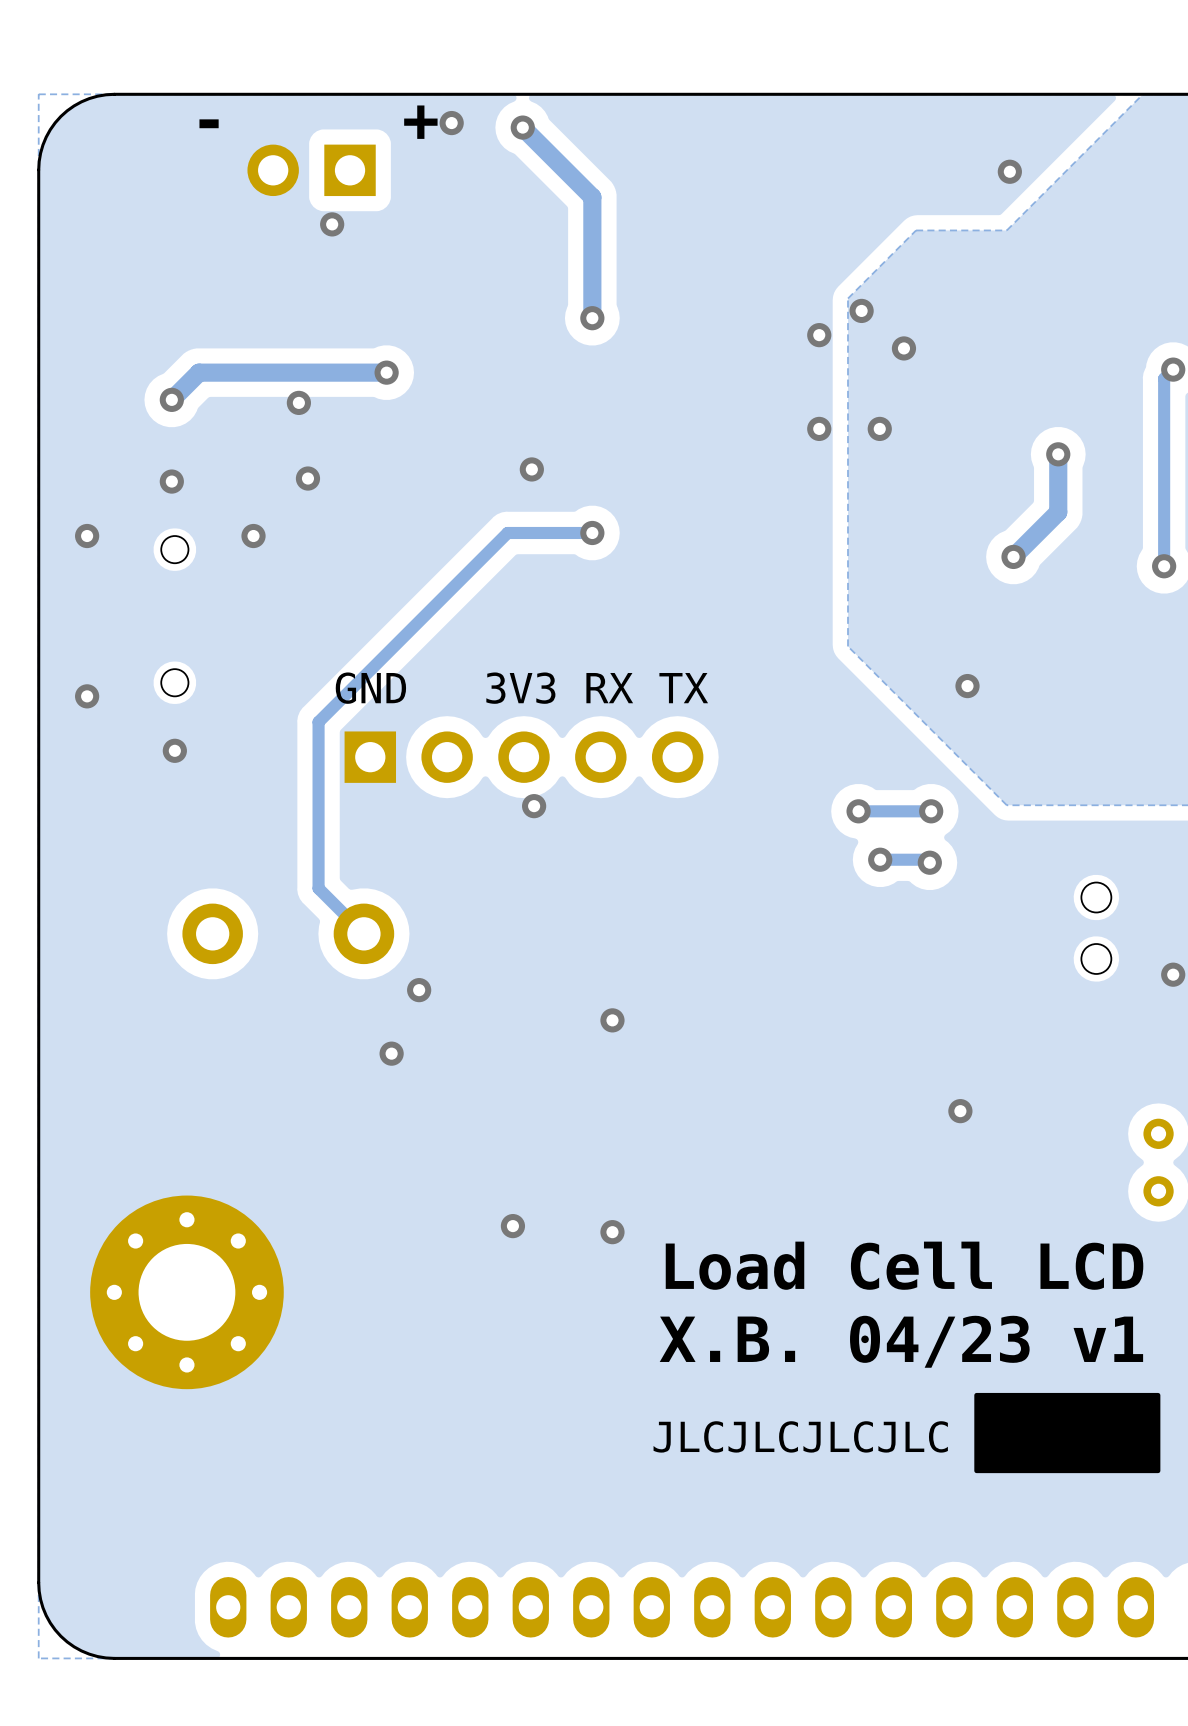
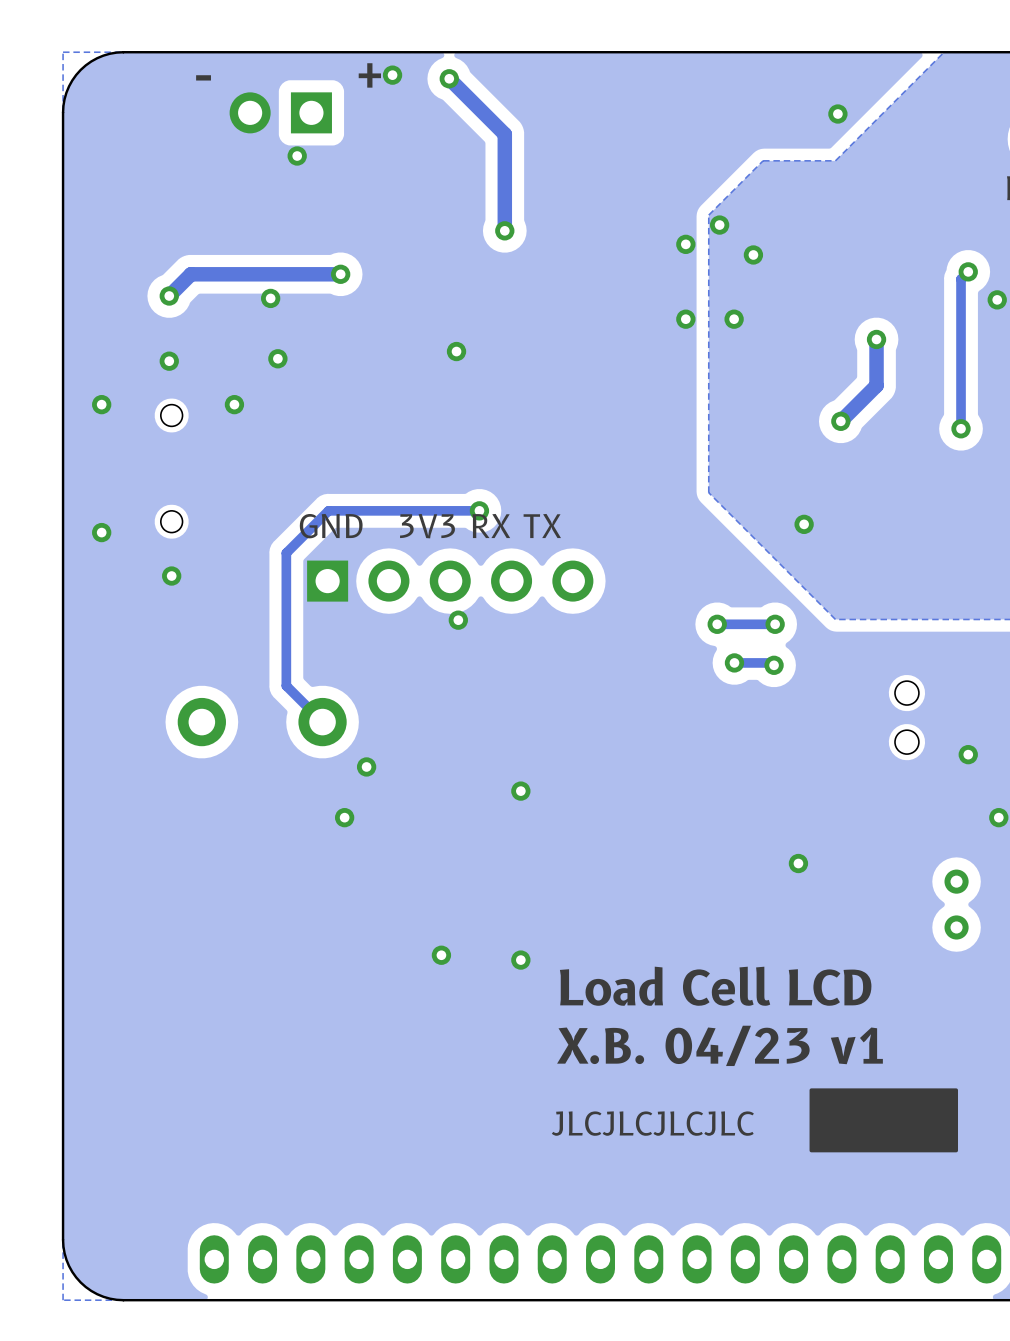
track: (592, 532) (507, 532) (371, 669) -> (479, 510) (328, 510)
via position: (592, 532) -> (479, 510)
part: (186, 1292) -> none

